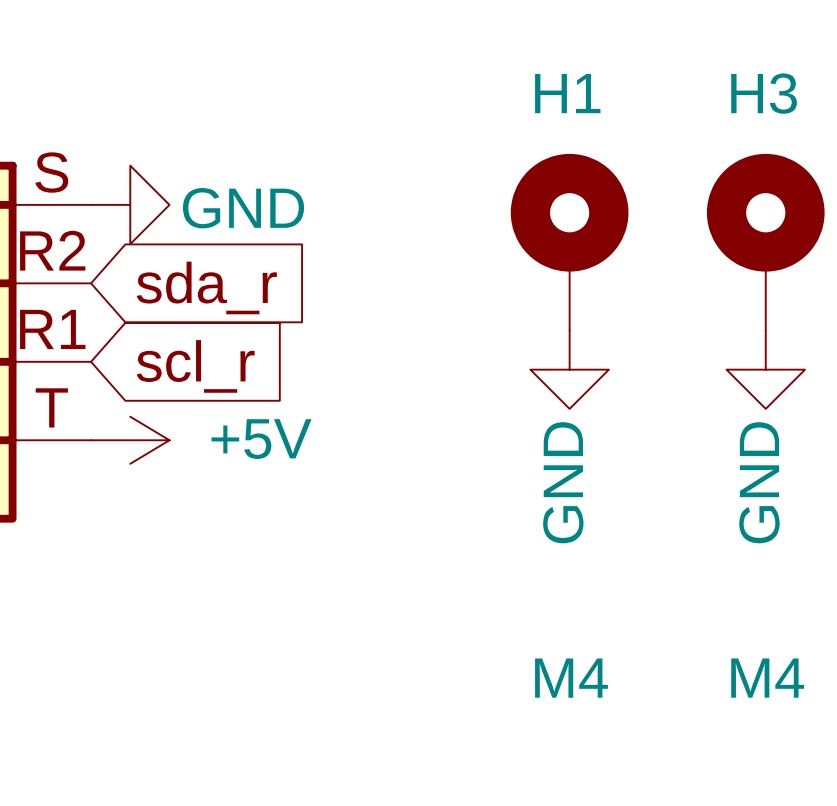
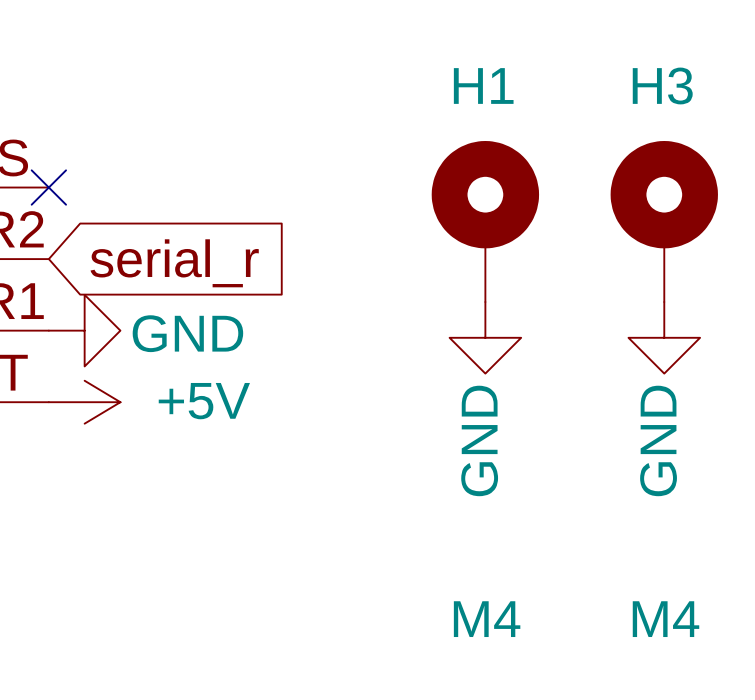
no-connect mark: none -> (48, 187)
power symbol position: GND (130, 204) -> GND (84, 330)
global label: sda_r (206, 287) -> serial_r (174, 263)
global label: scl_r (195, 366) -> none

